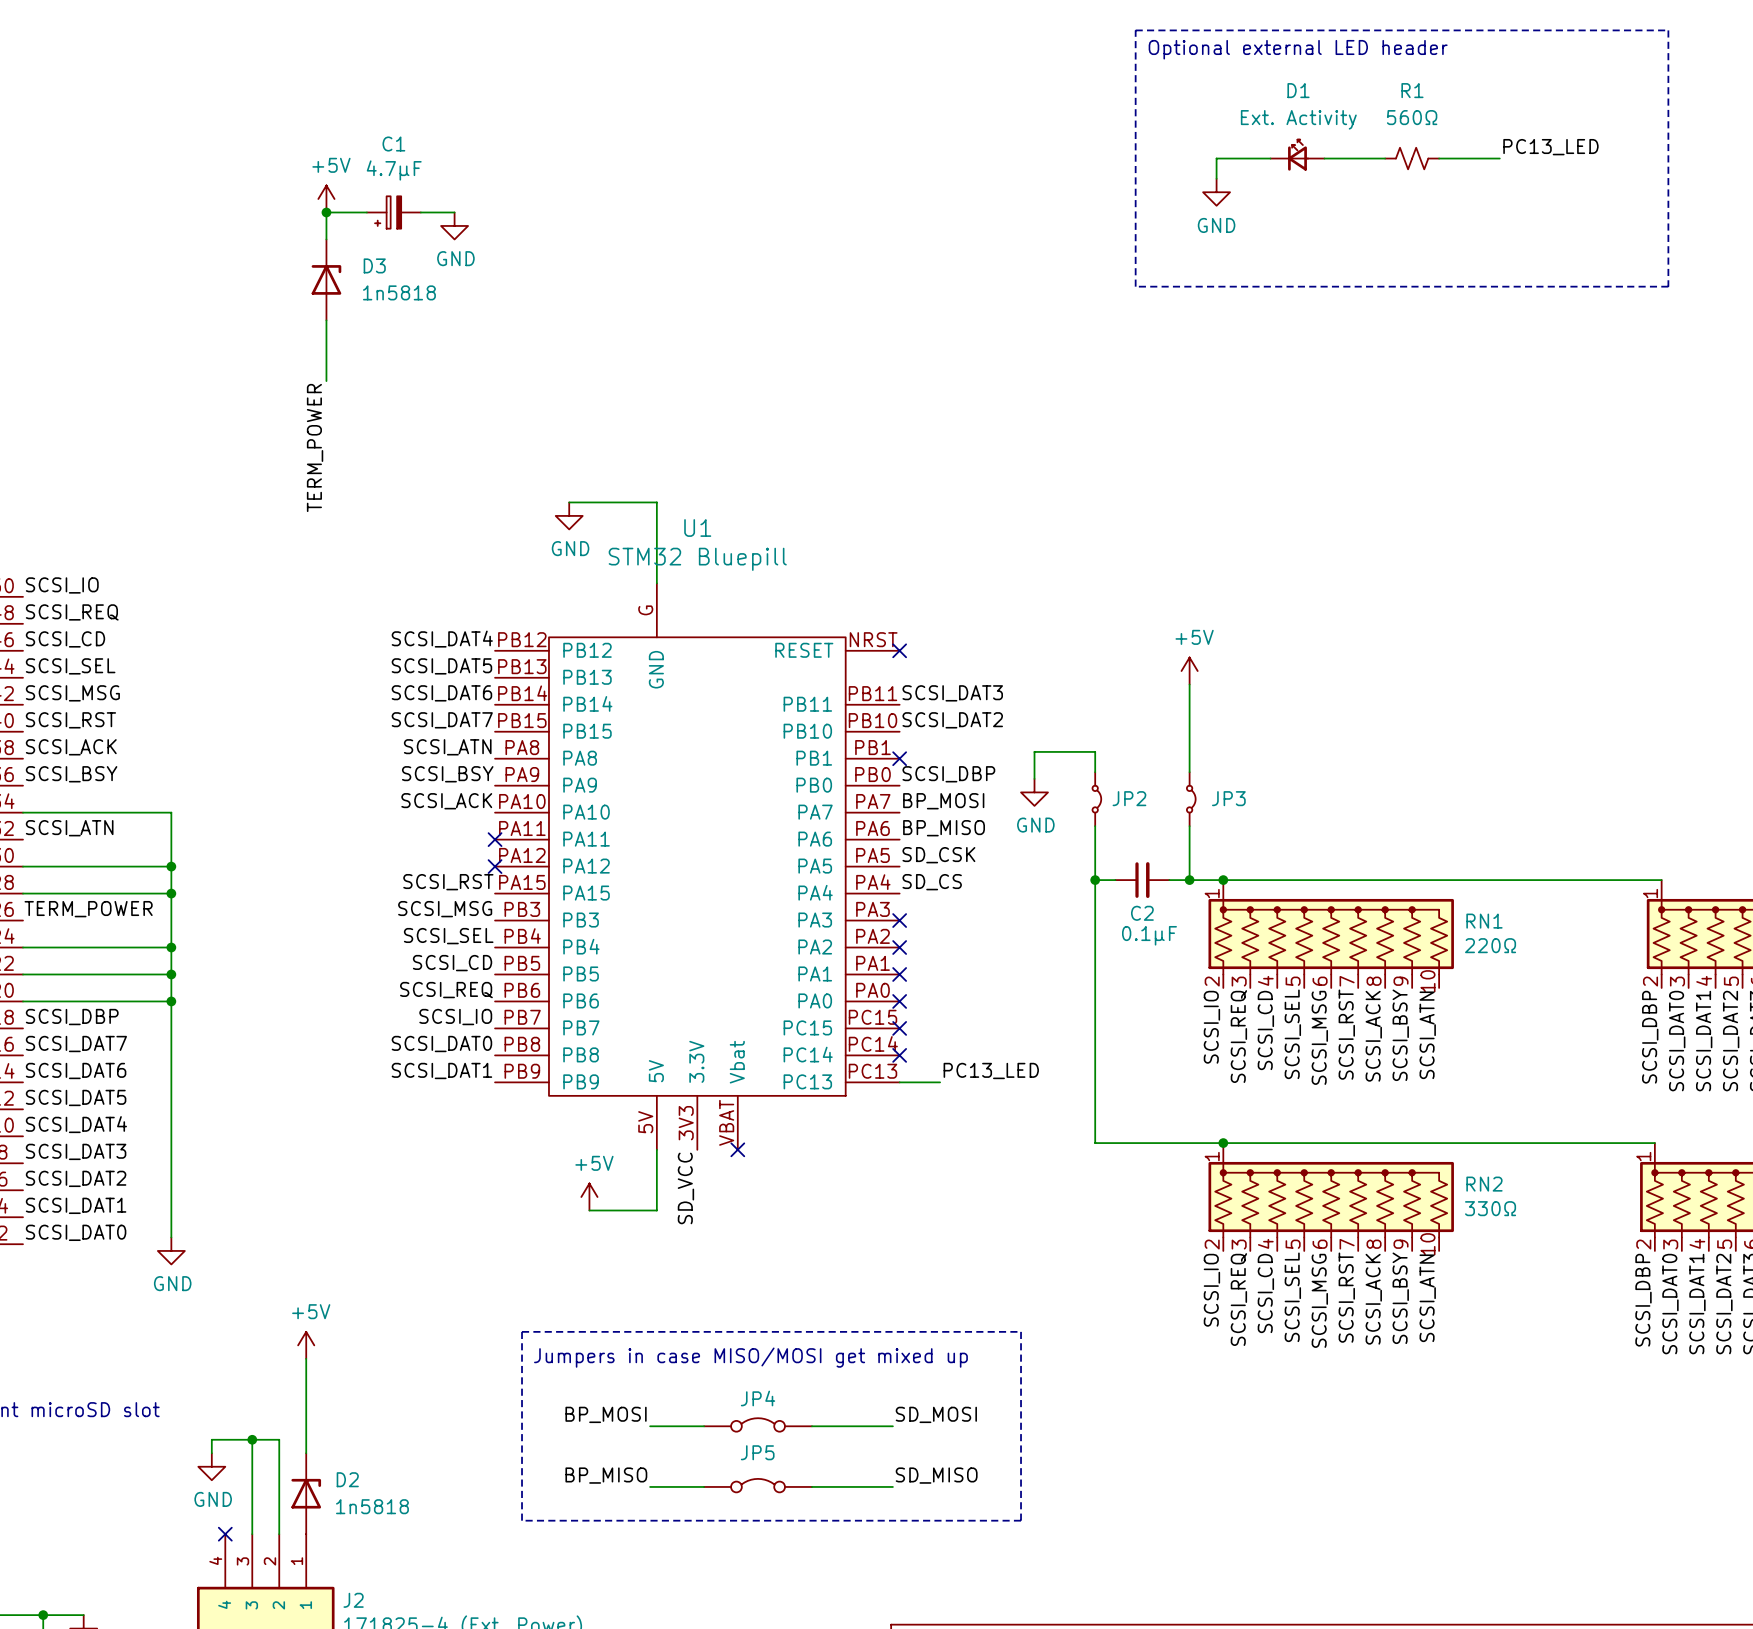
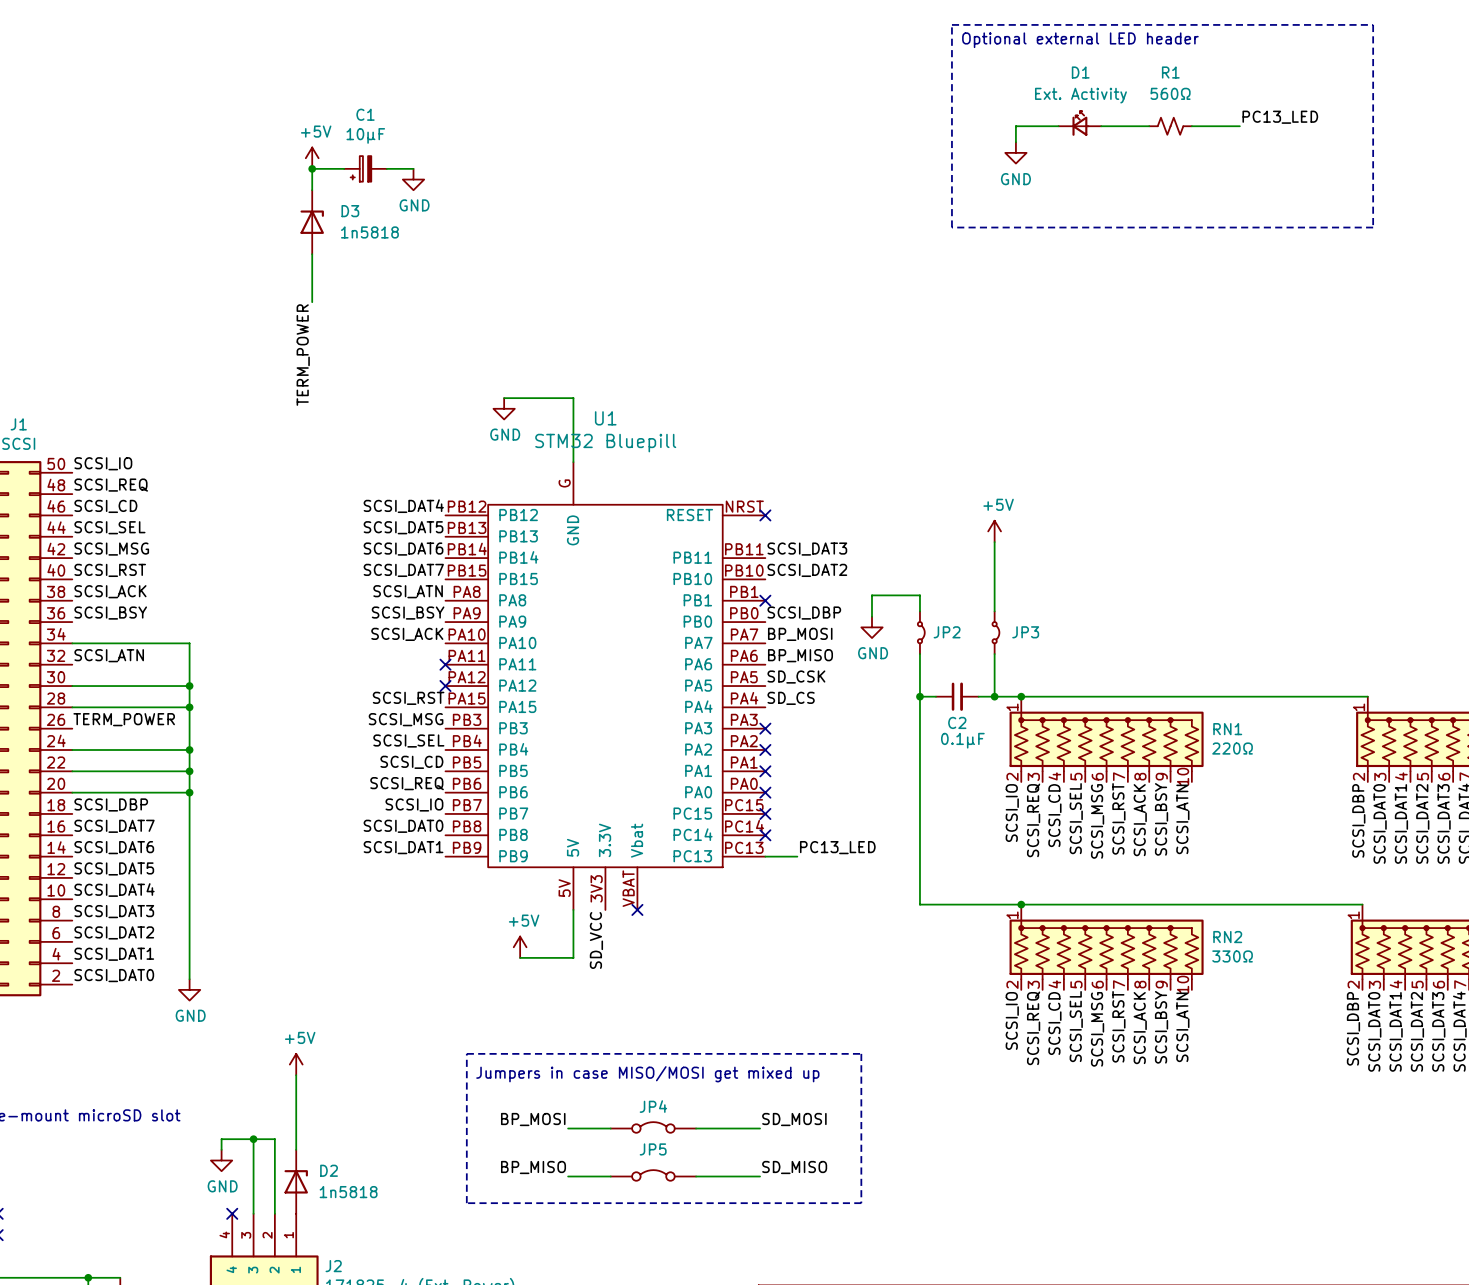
C1 value: 4.7µF (394, 170) -> 10µF (365, 135)

